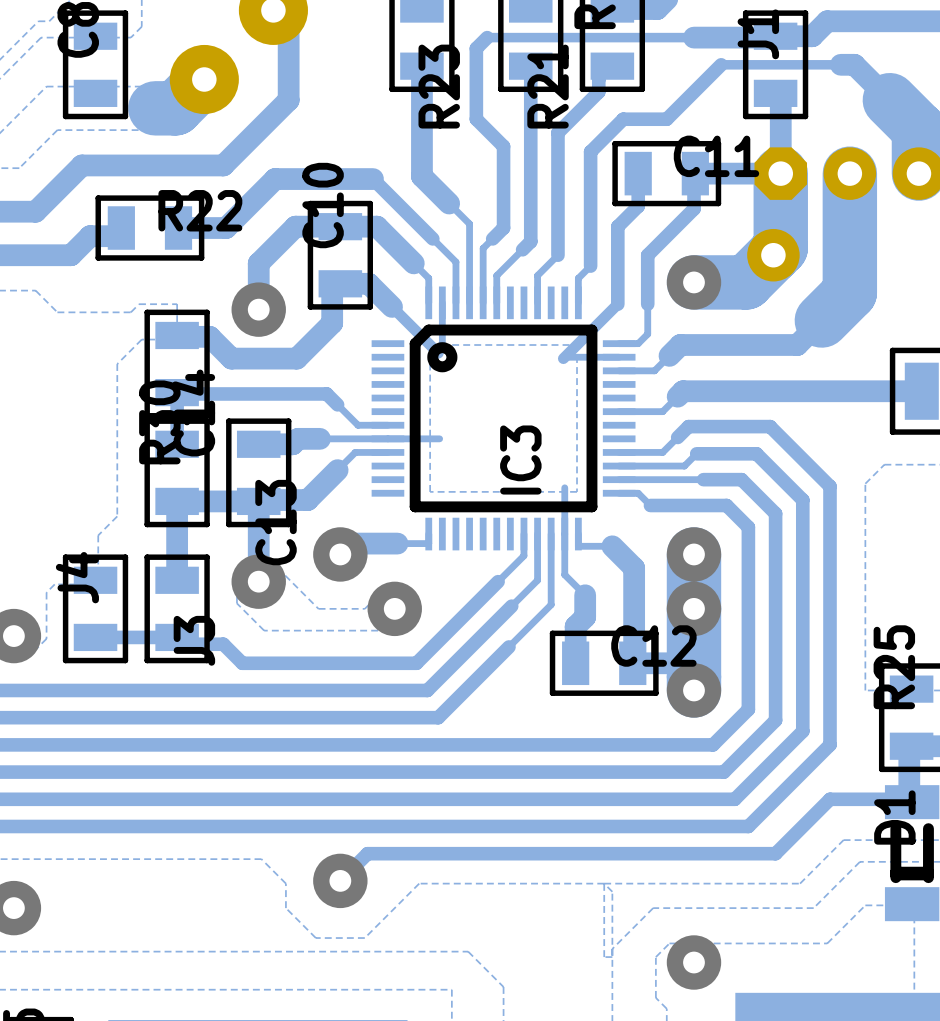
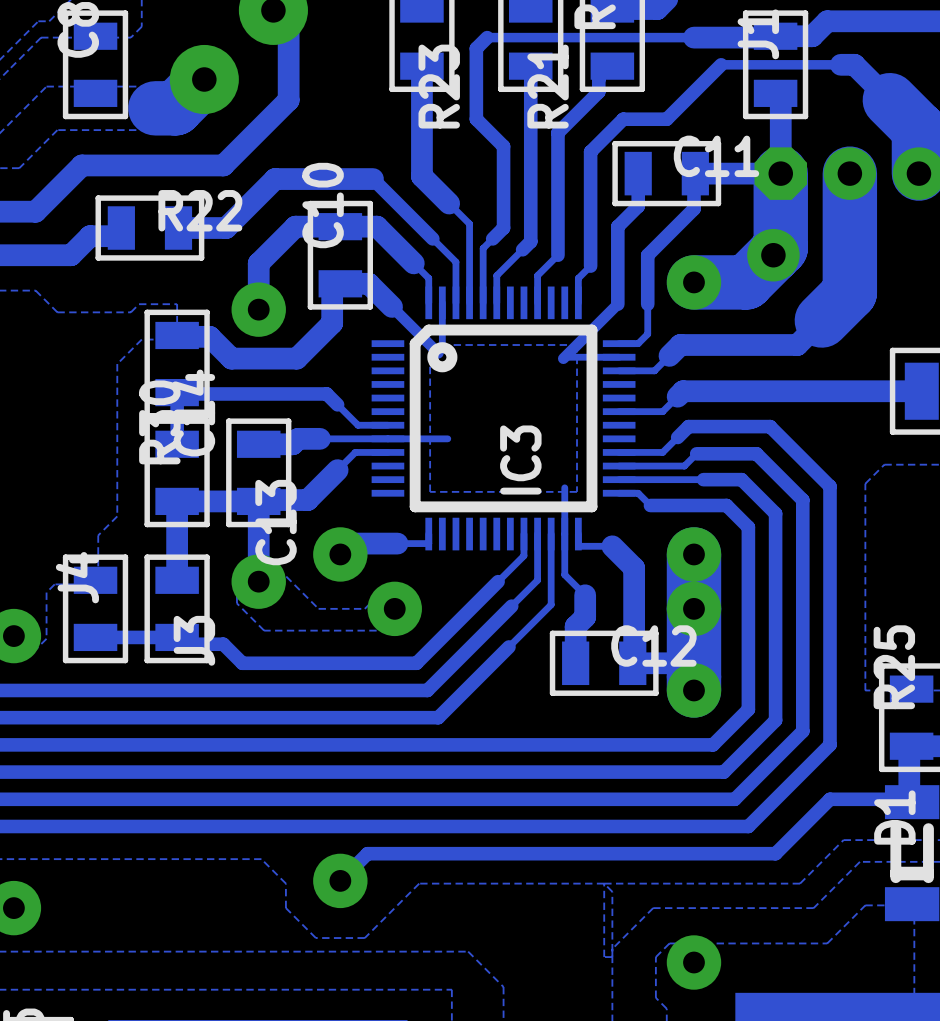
track: none -> (447, 438) (439, 438)

